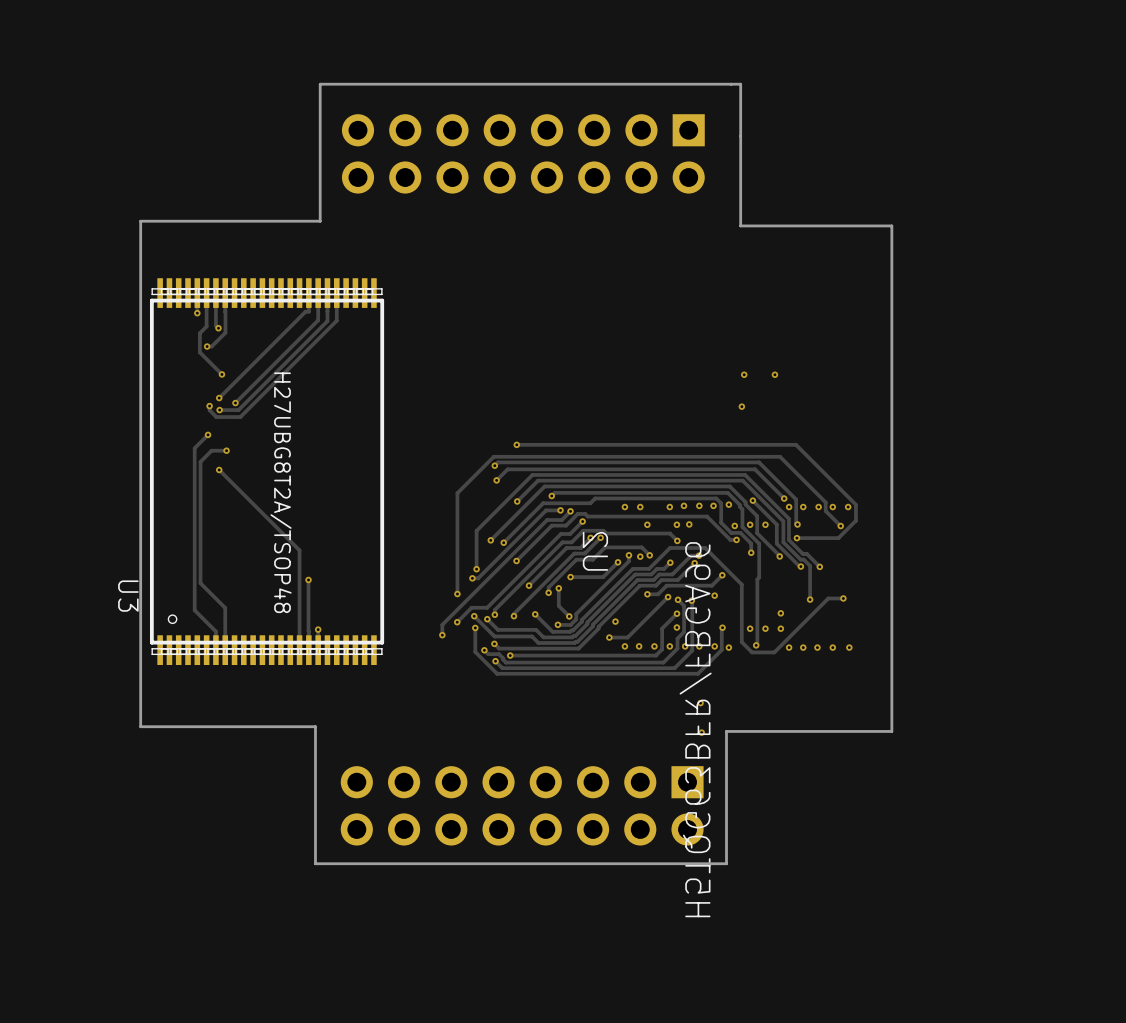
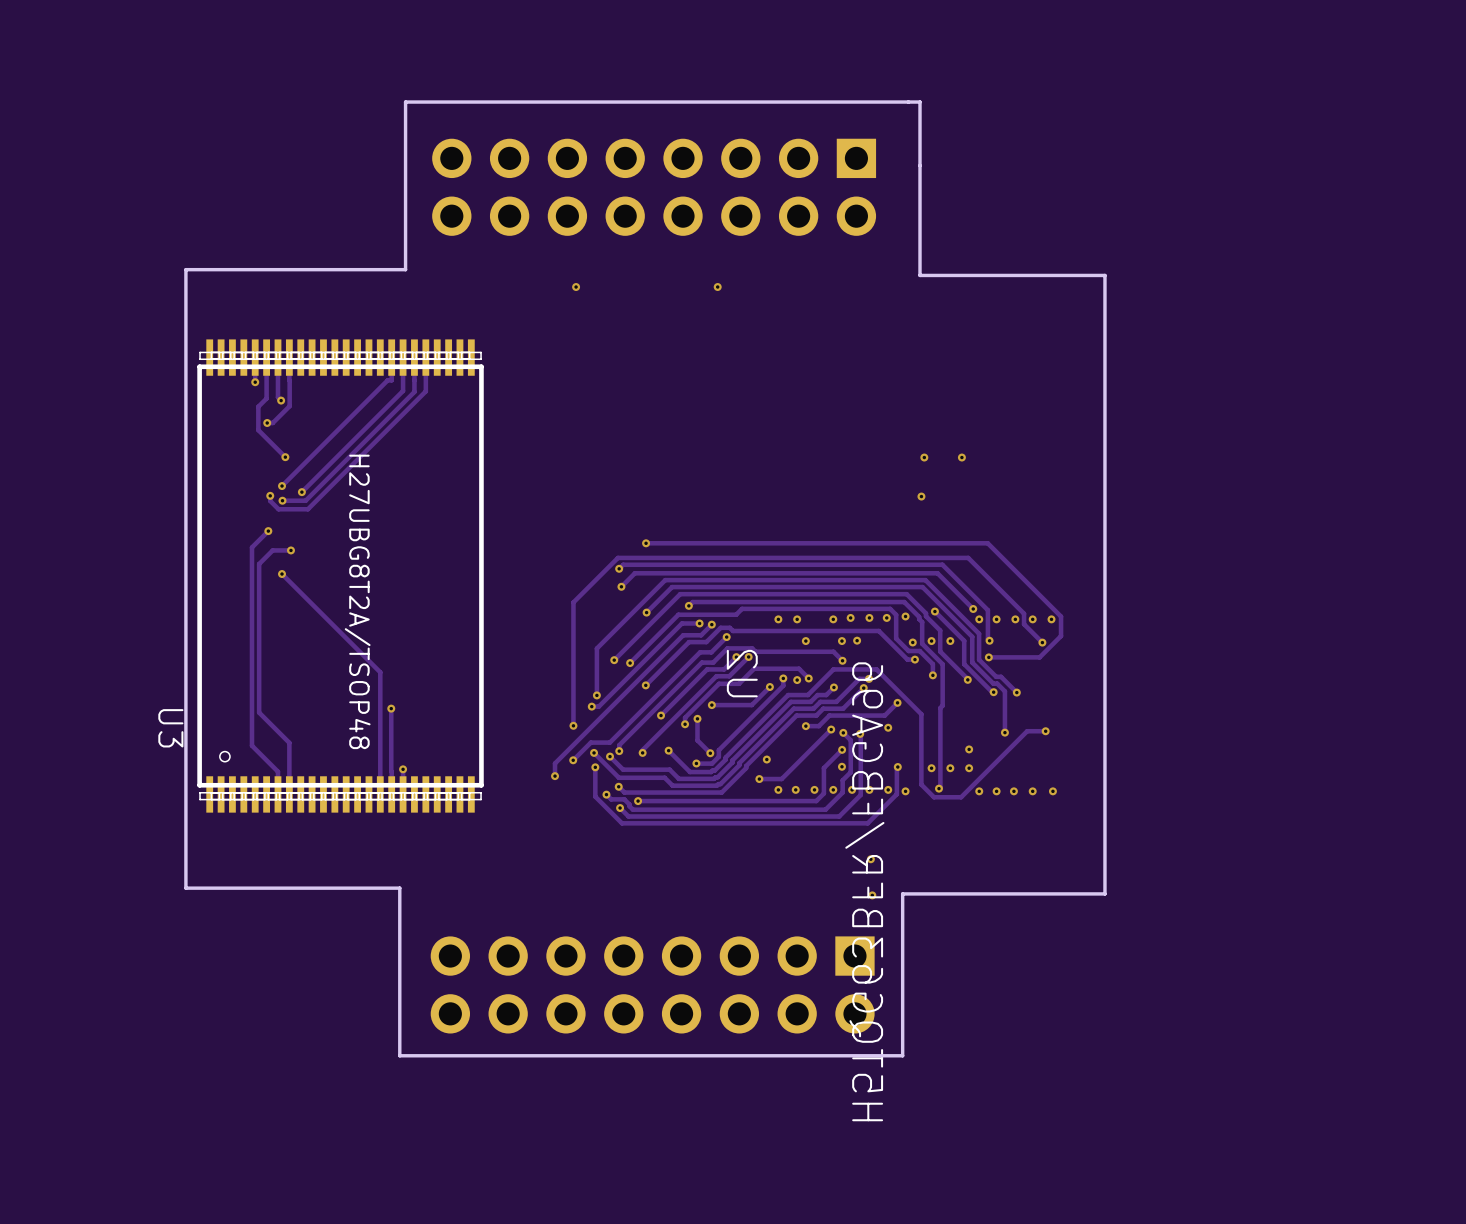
via: none -> (576, 287)
via: none -> (717, 287)

